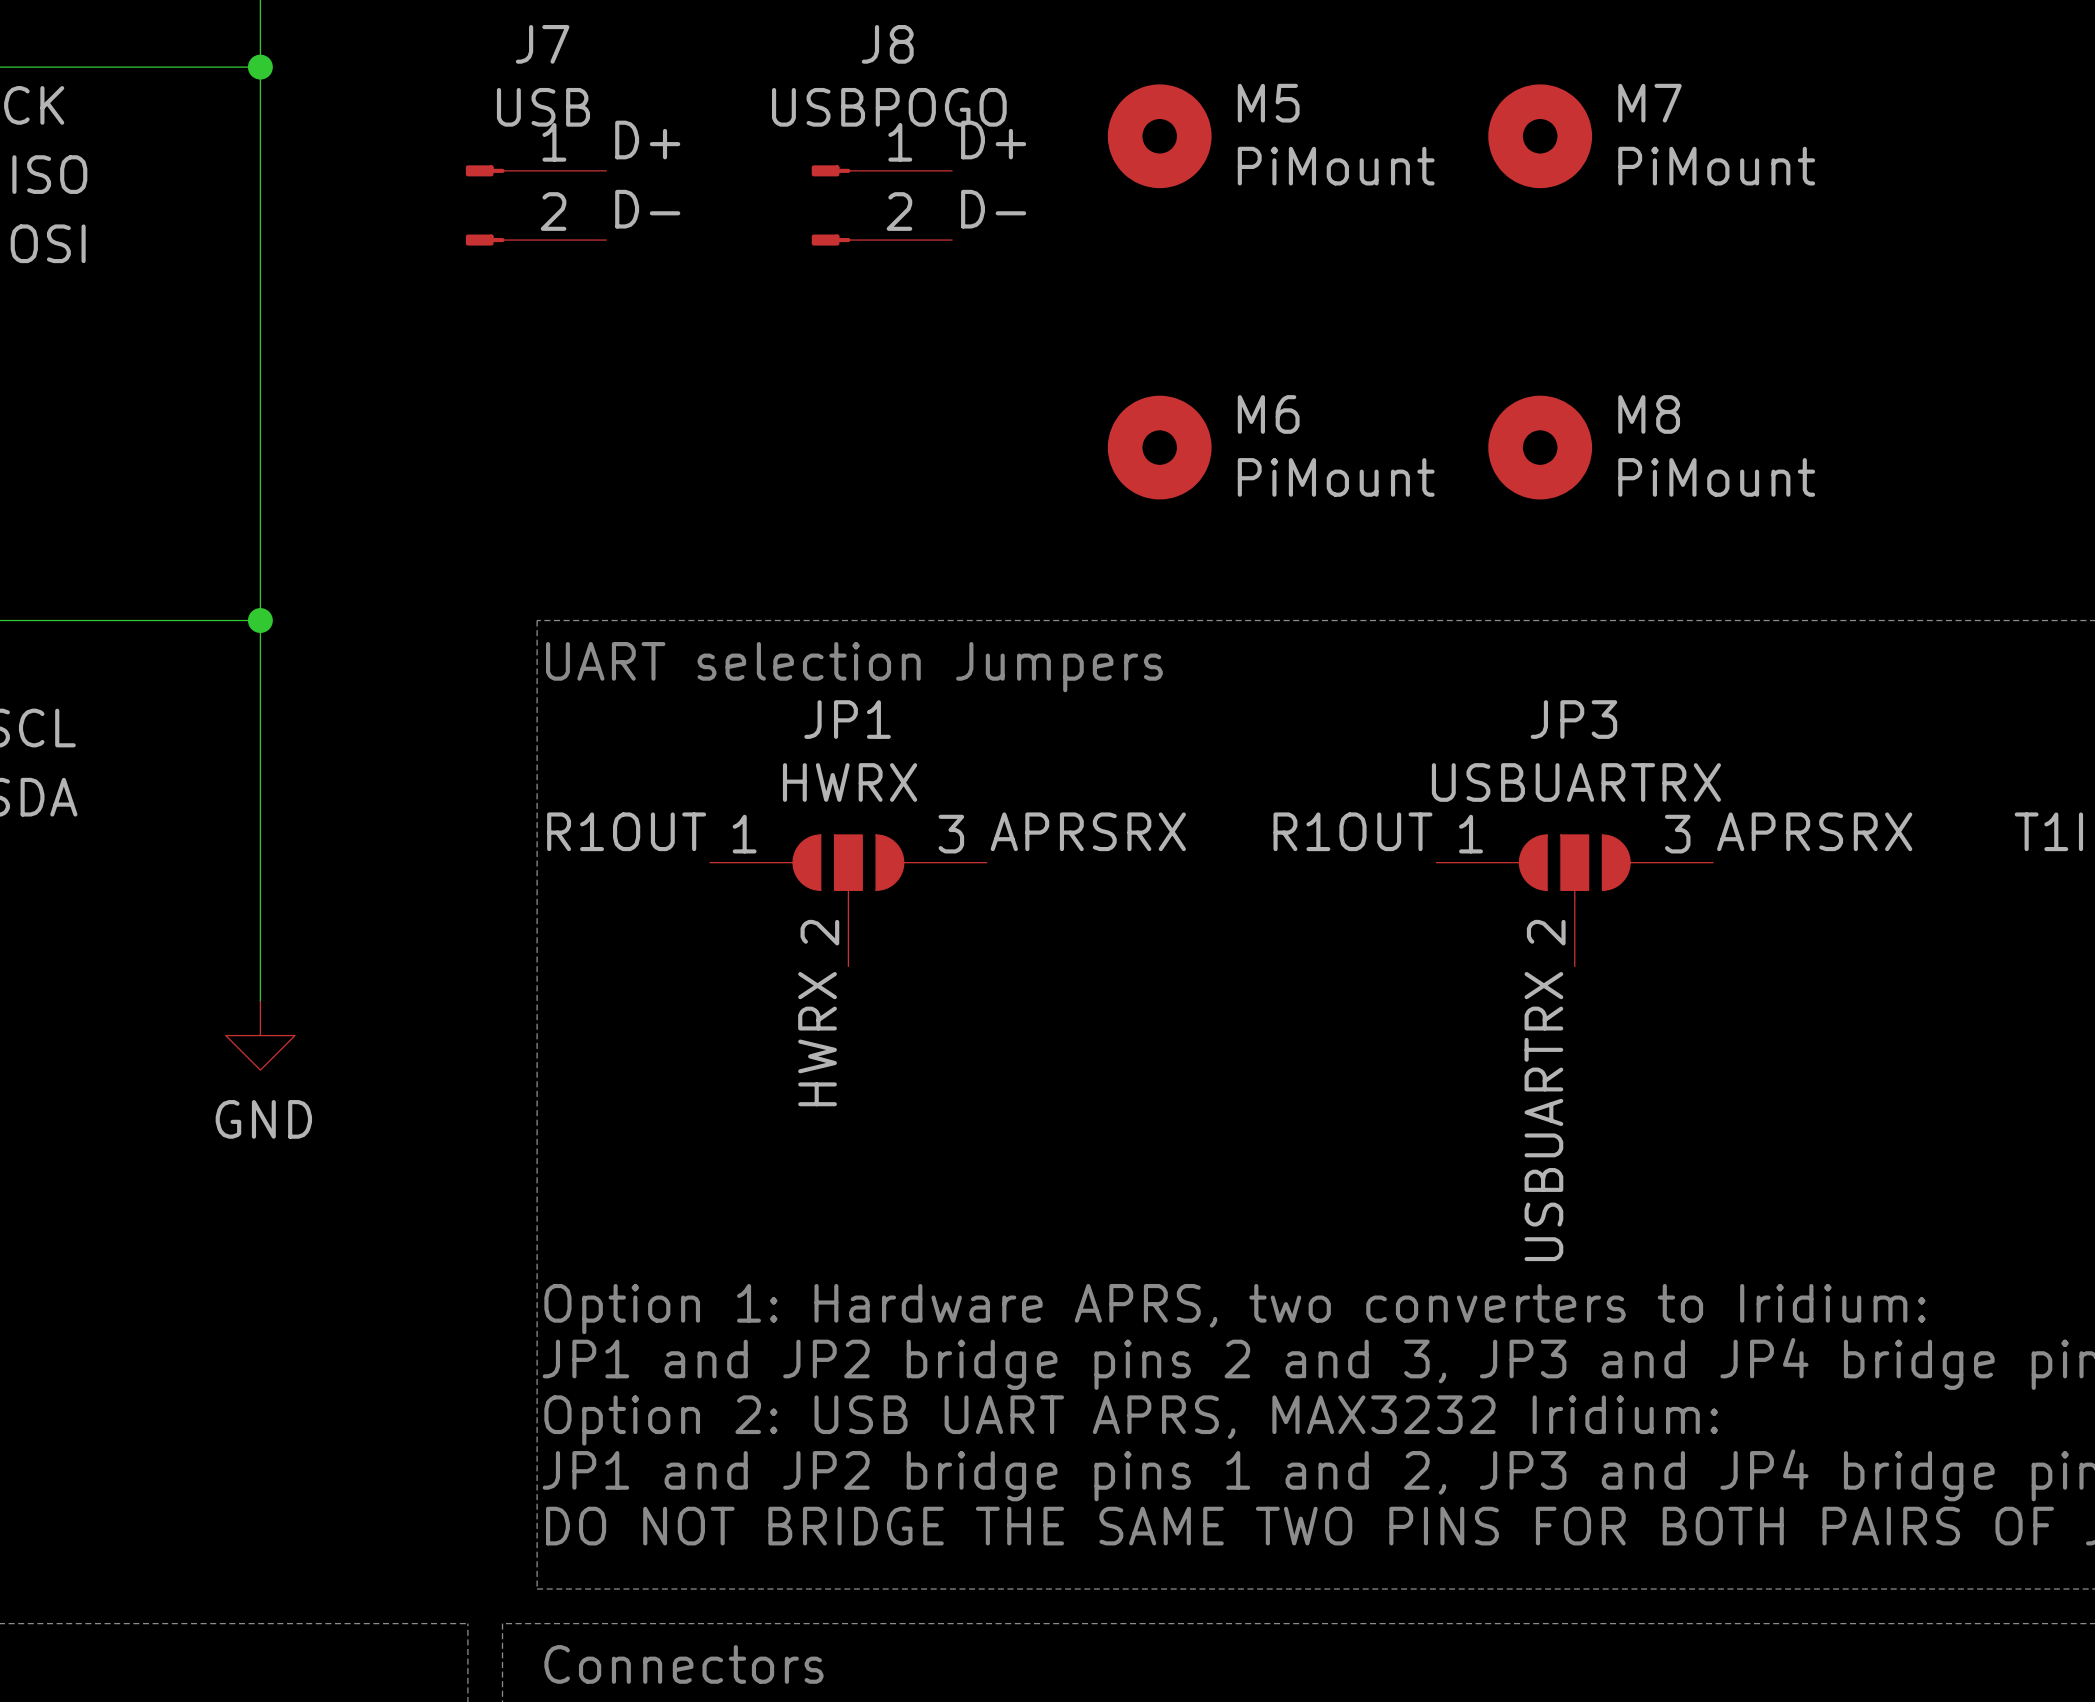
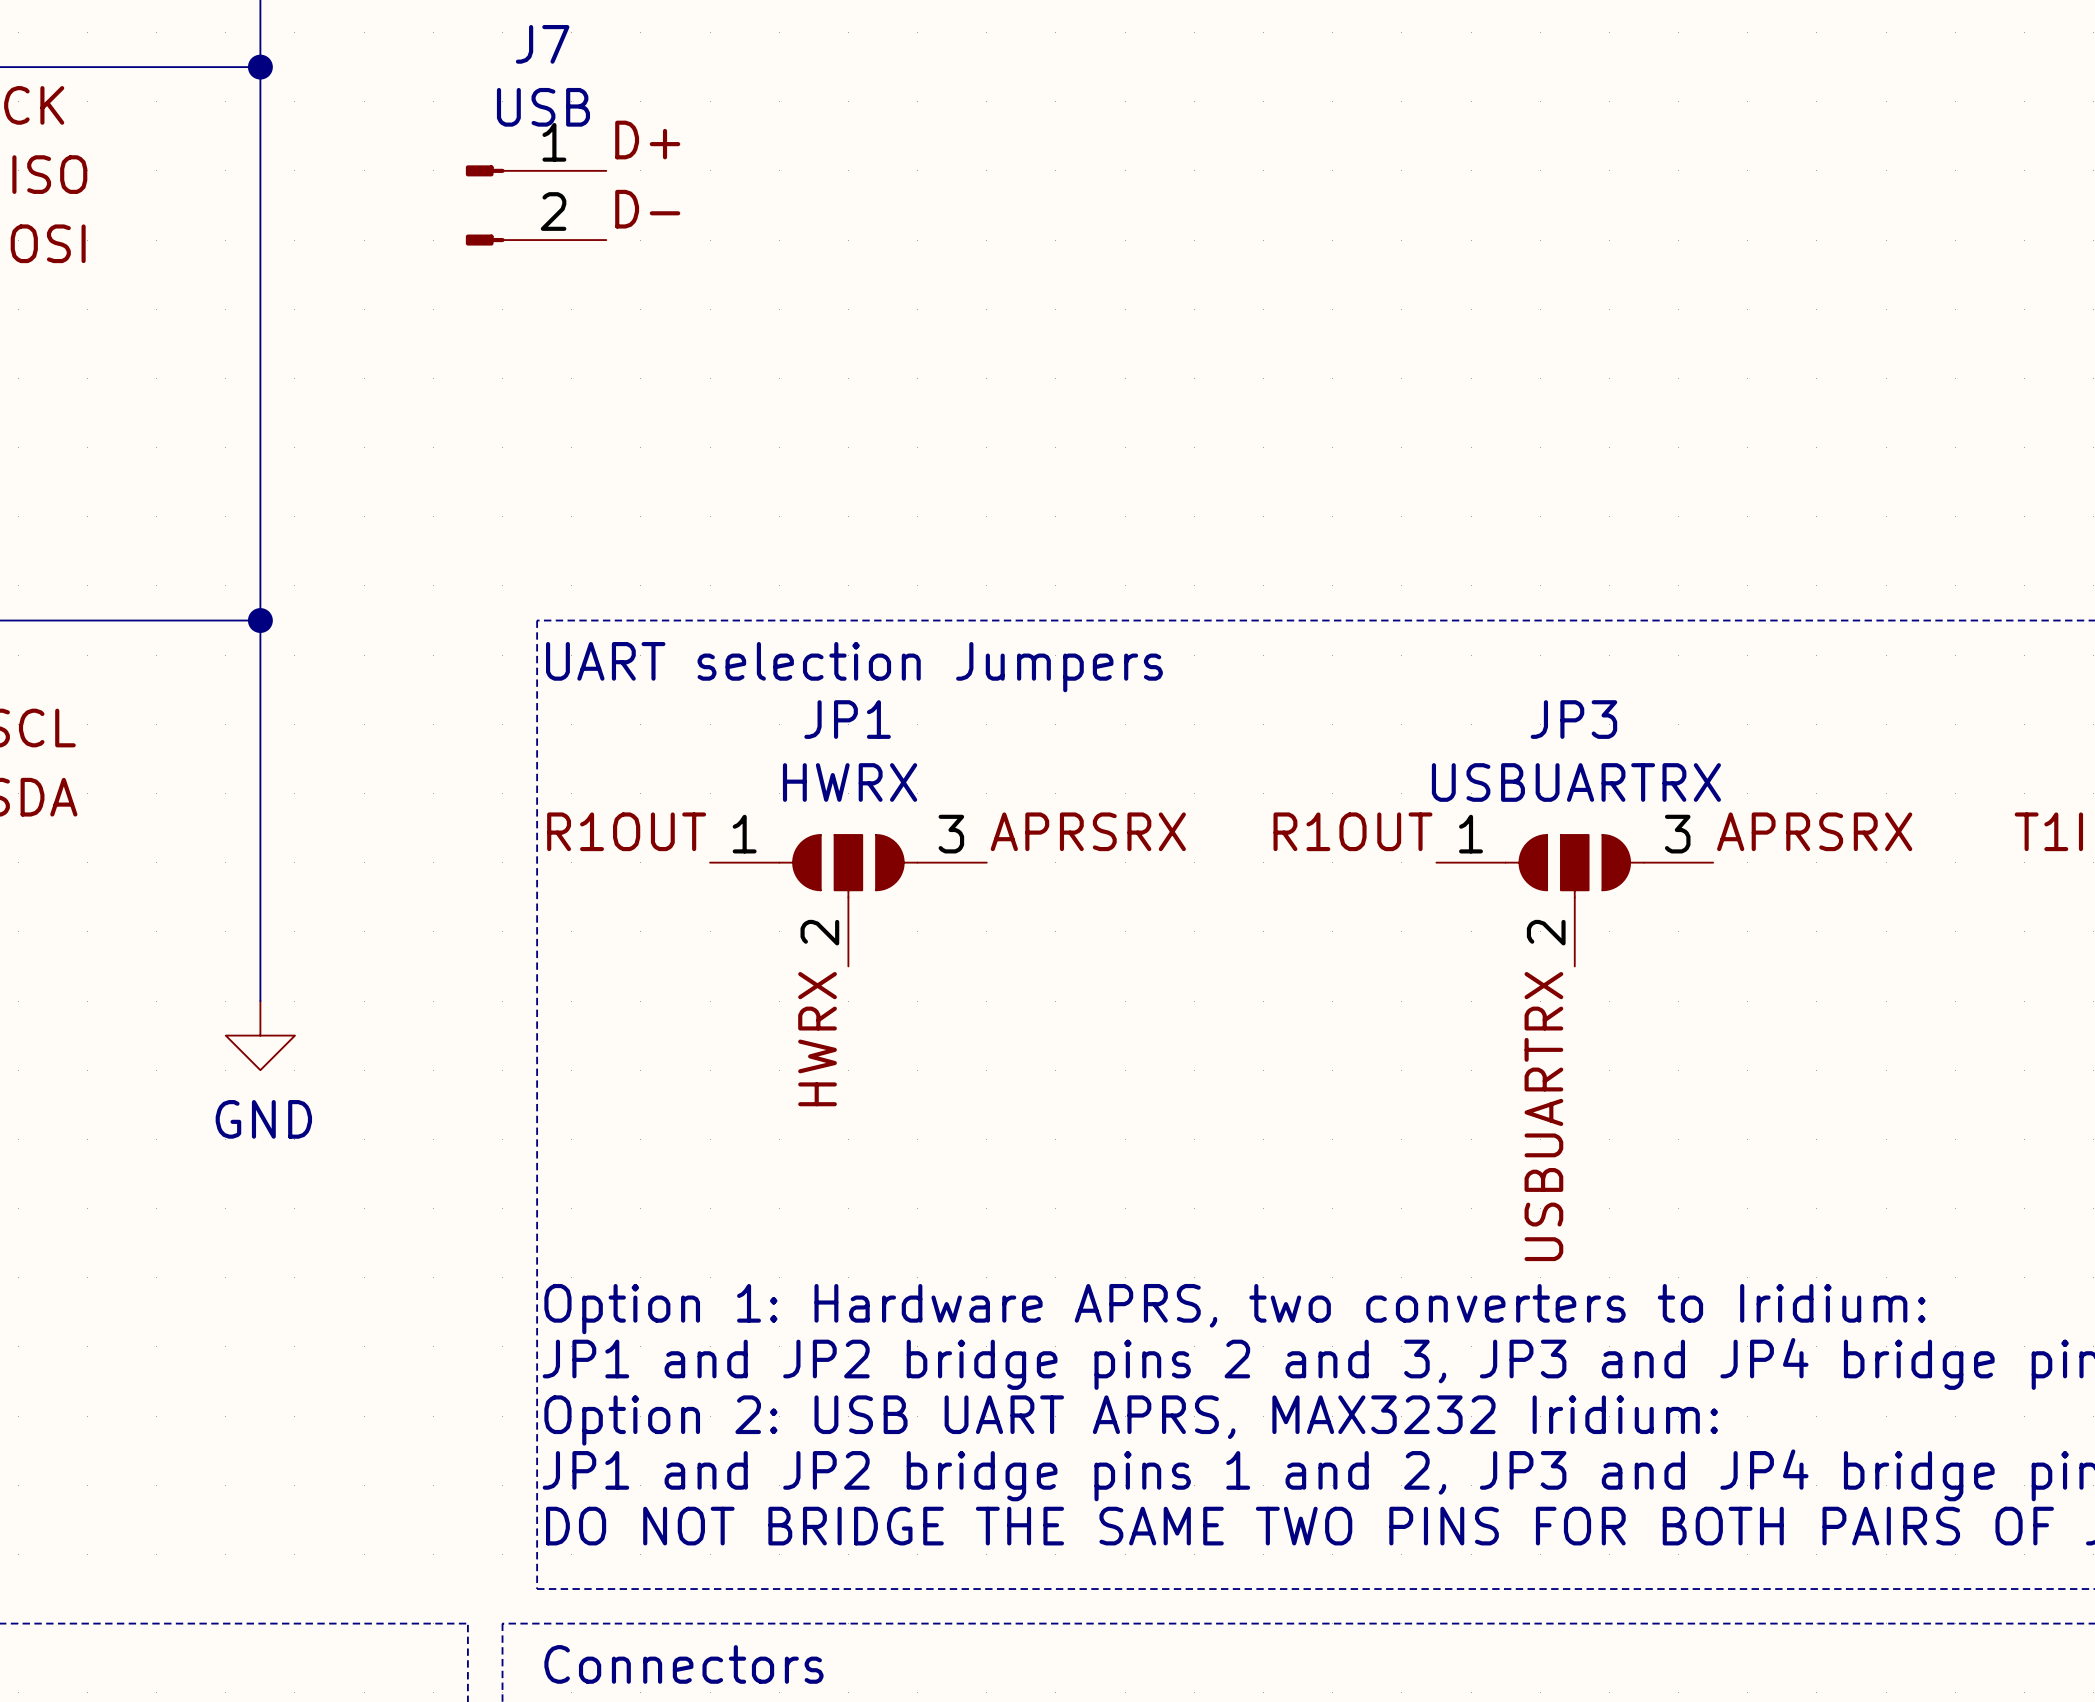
M5: PiMount (1159, 136) -> none
M7: PiMount (1540, 136) -> none
label: D+ (993, 140) -> none
J8: USBPOGO (881, 205) -> none
label: D- (993, 209) -> none
M6: PiMount (1159, 447) -> none
M8: PiMount (1540, 447) -> none

